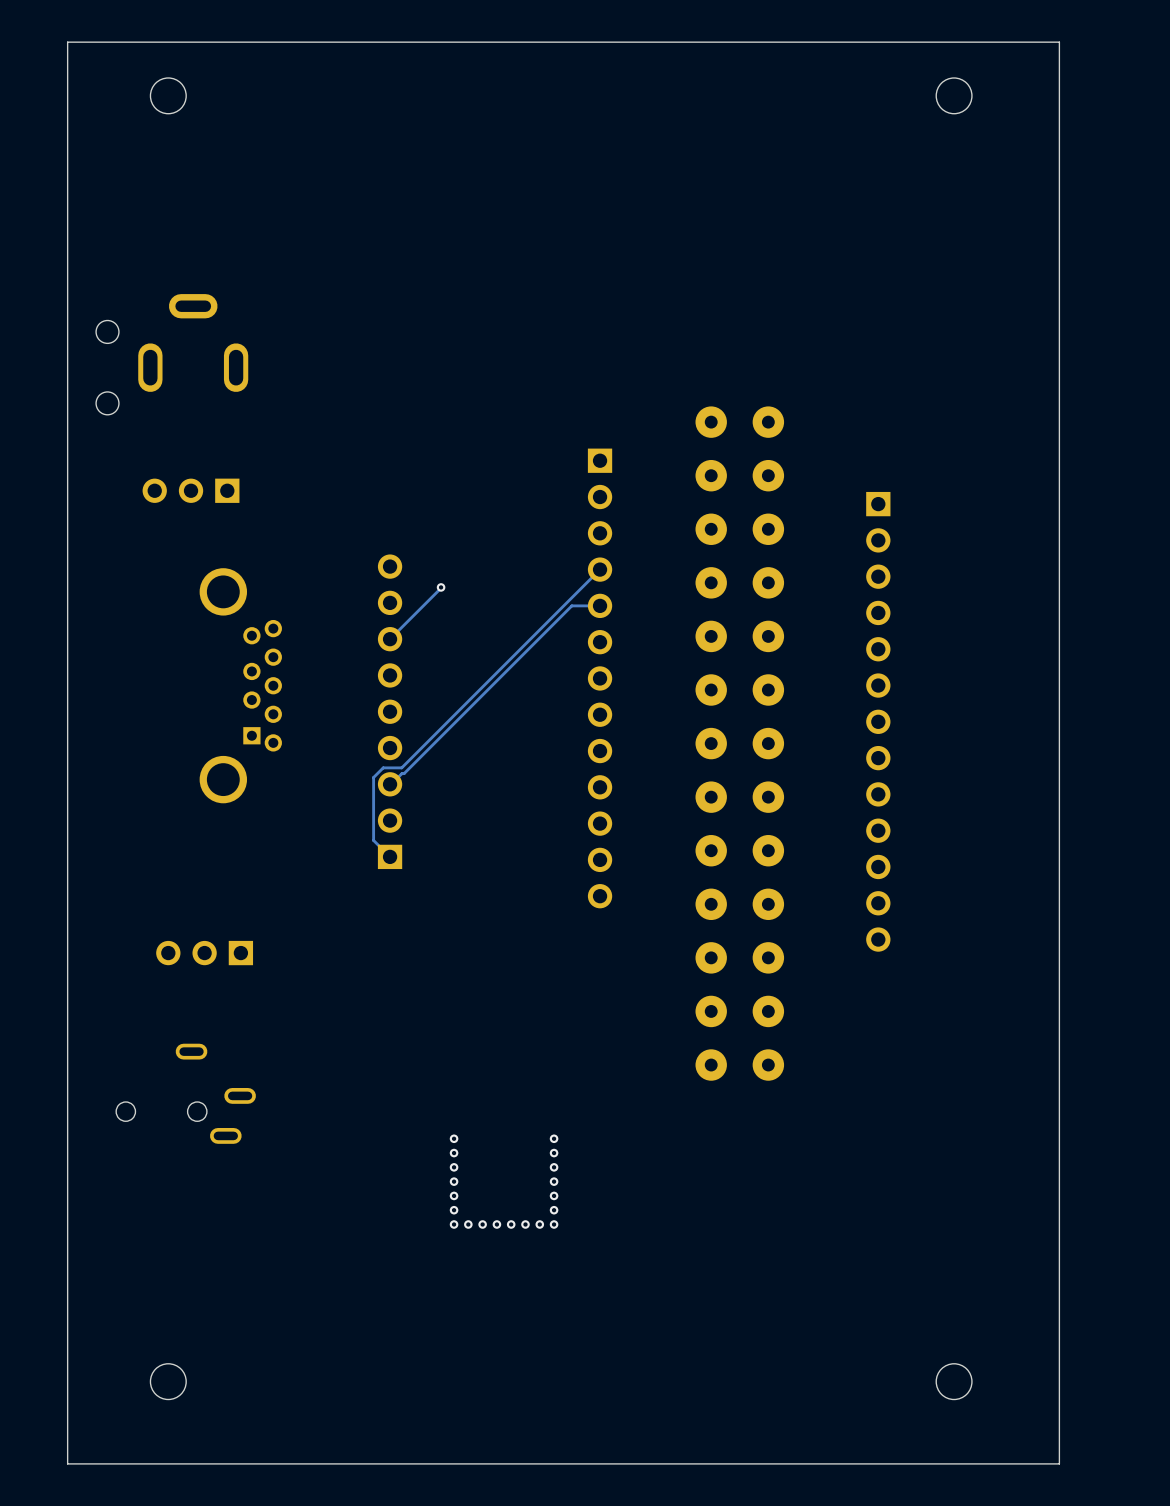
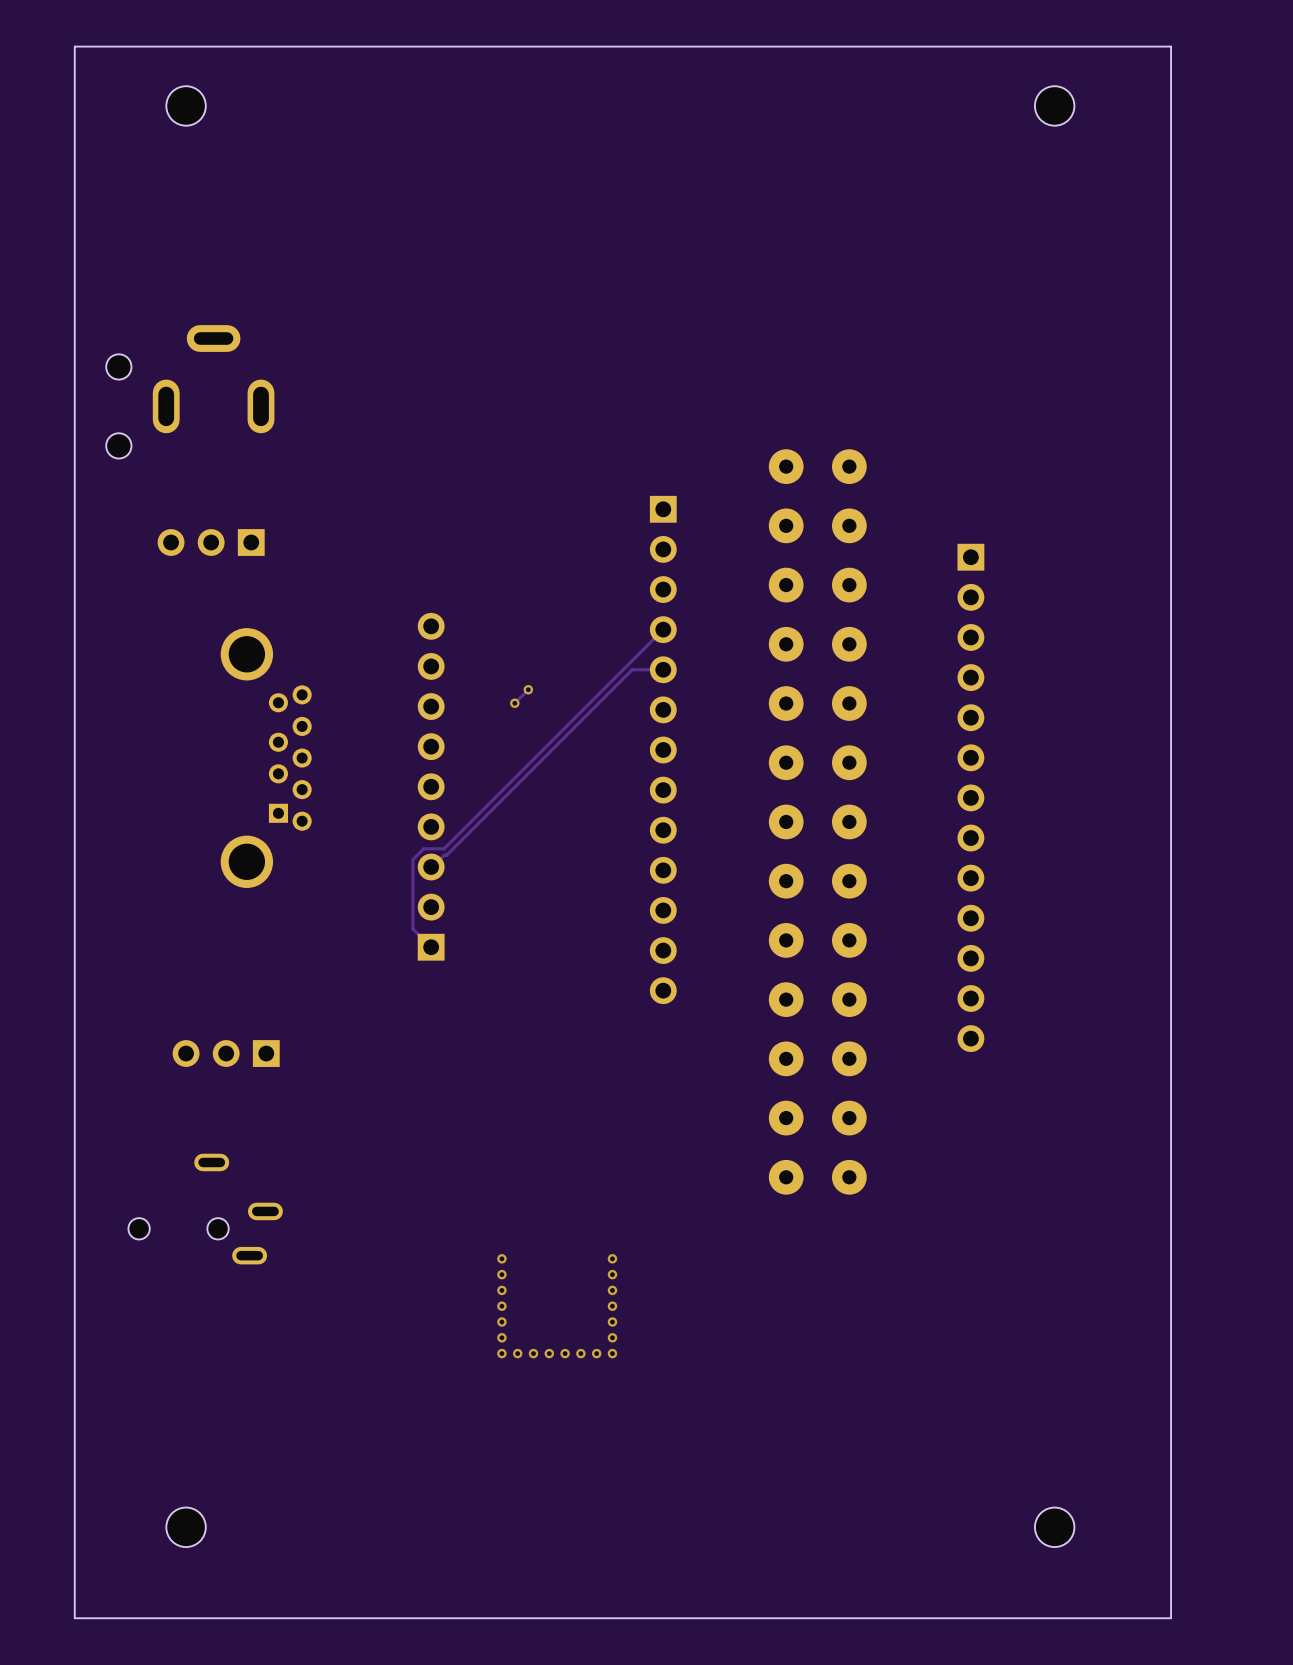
track: (441, 587) (390, 639) -> none
via: (441, 587) -> none
track: none -> (528, 689) (514, 703)
via: none -> (528, 689)
via: none -> (514, 703)

